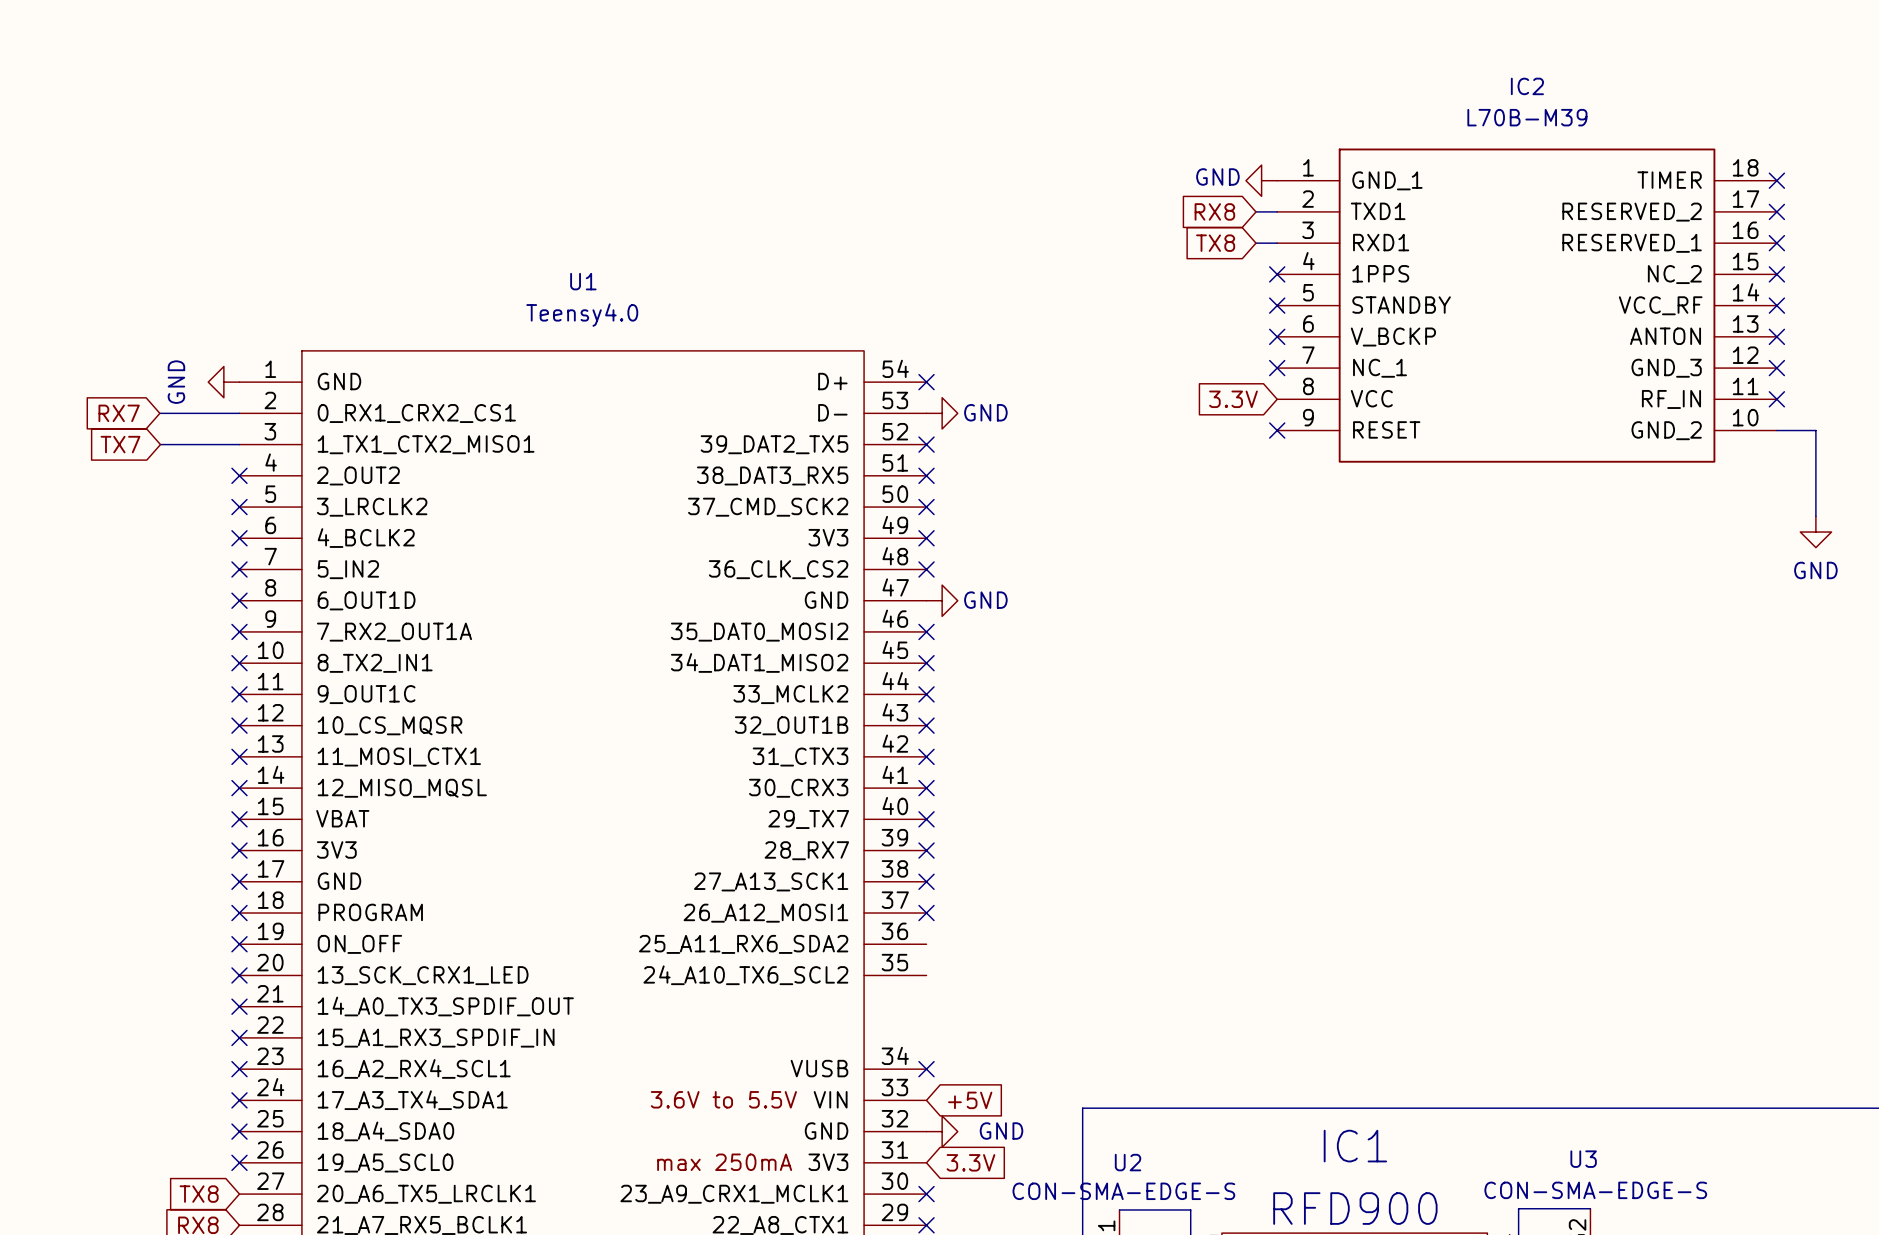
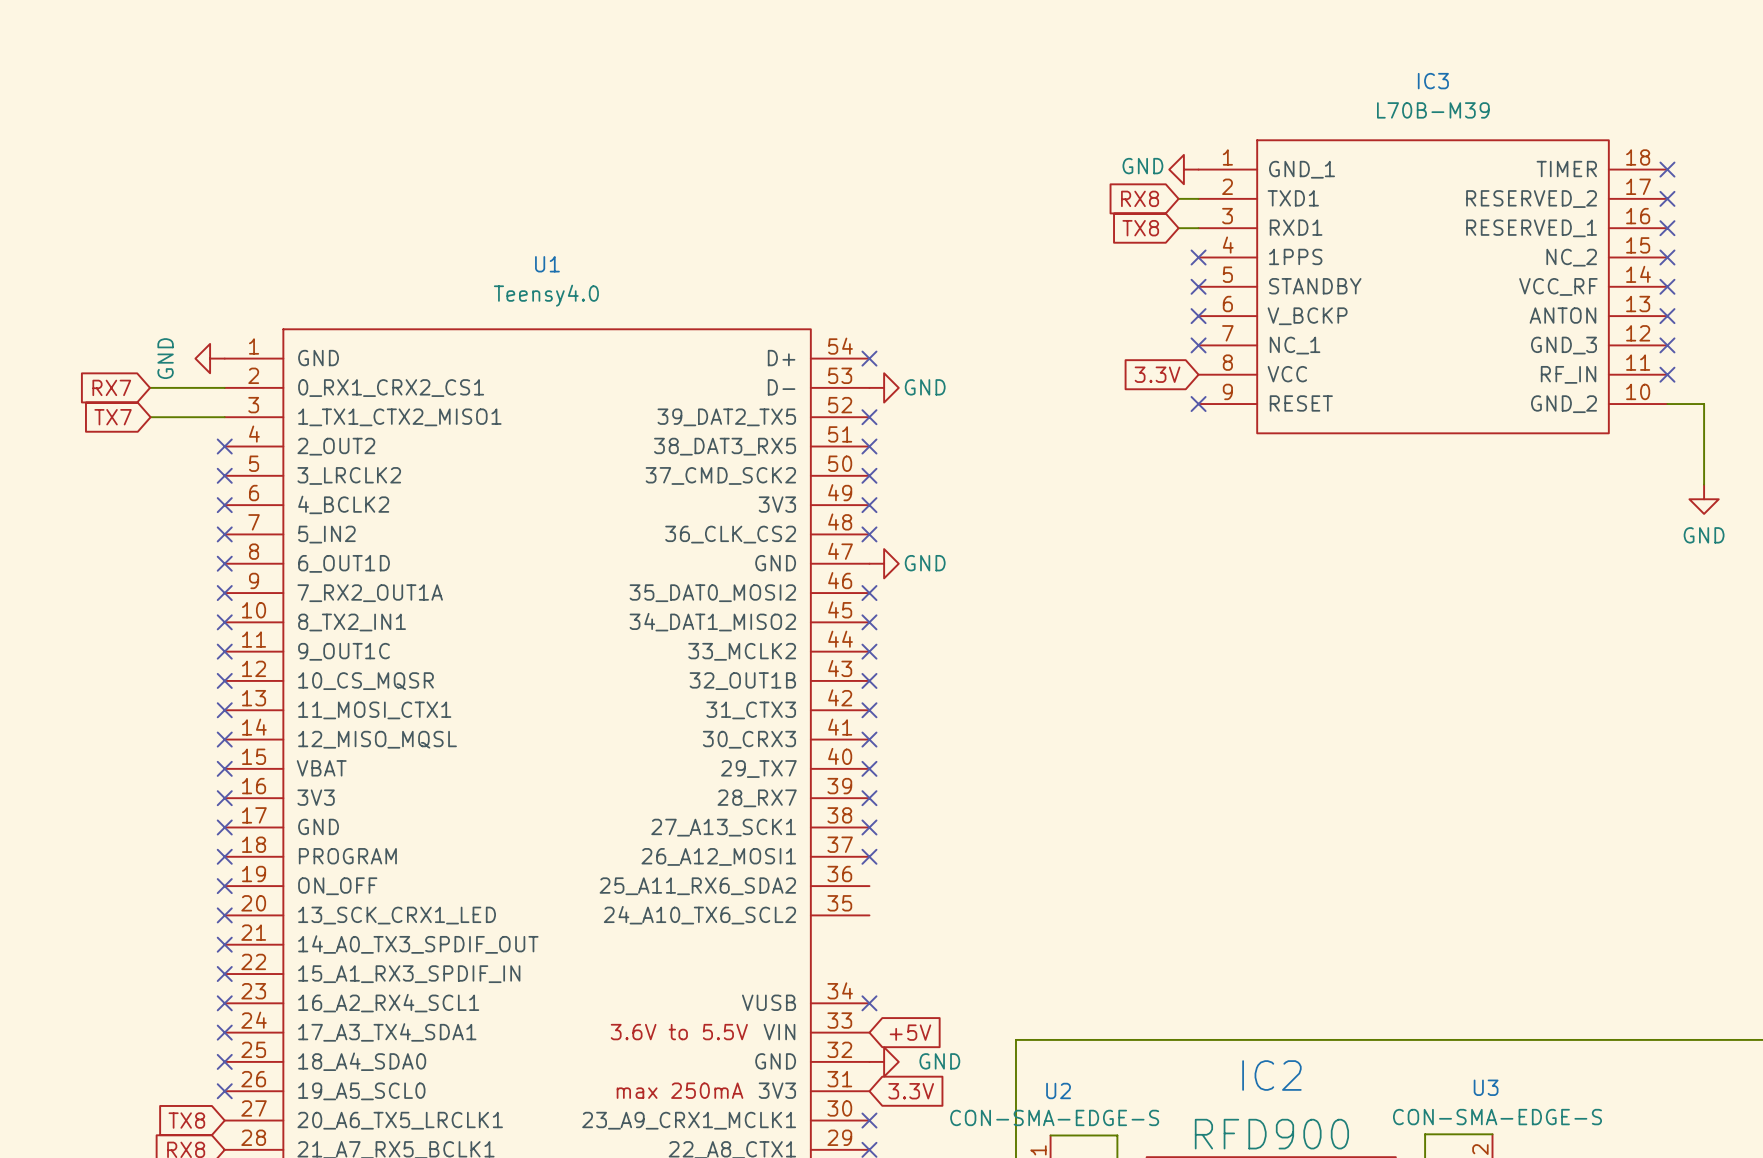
IC2 name: IC2 (1527, 86) -> IC3 (1433, 81)
IC1 name: IC1 (1355, 1146) -> IC2 (1271, 1075)

